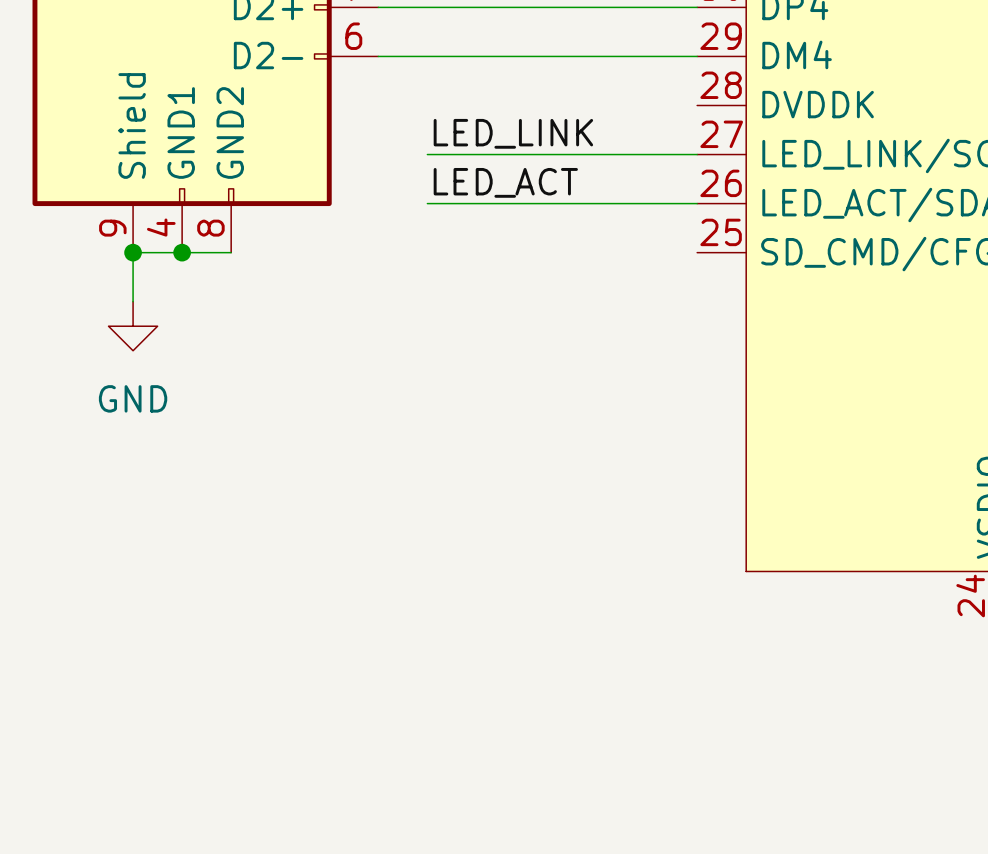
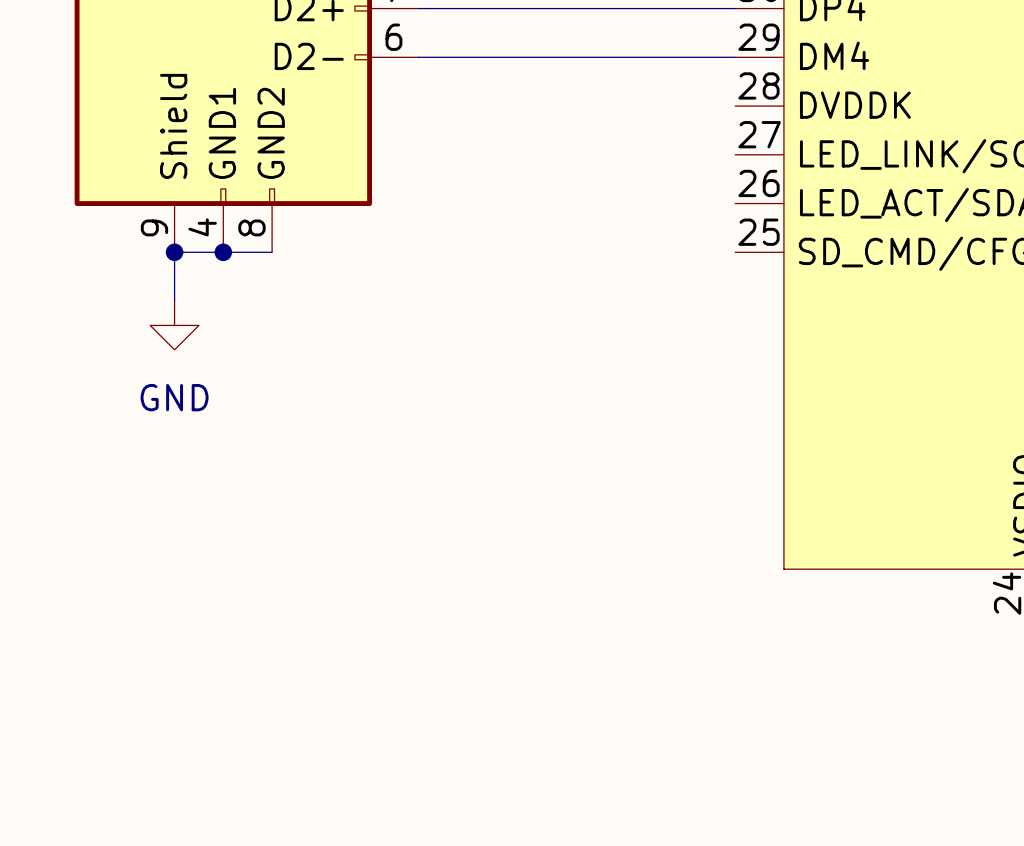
label: LED_LINK (513, 133) -> none
wire: (427, 154) (697, 154) -> none
label: LED_ACT (505, 182) -> none
wire: (427, 203) (697, 203) -> none

